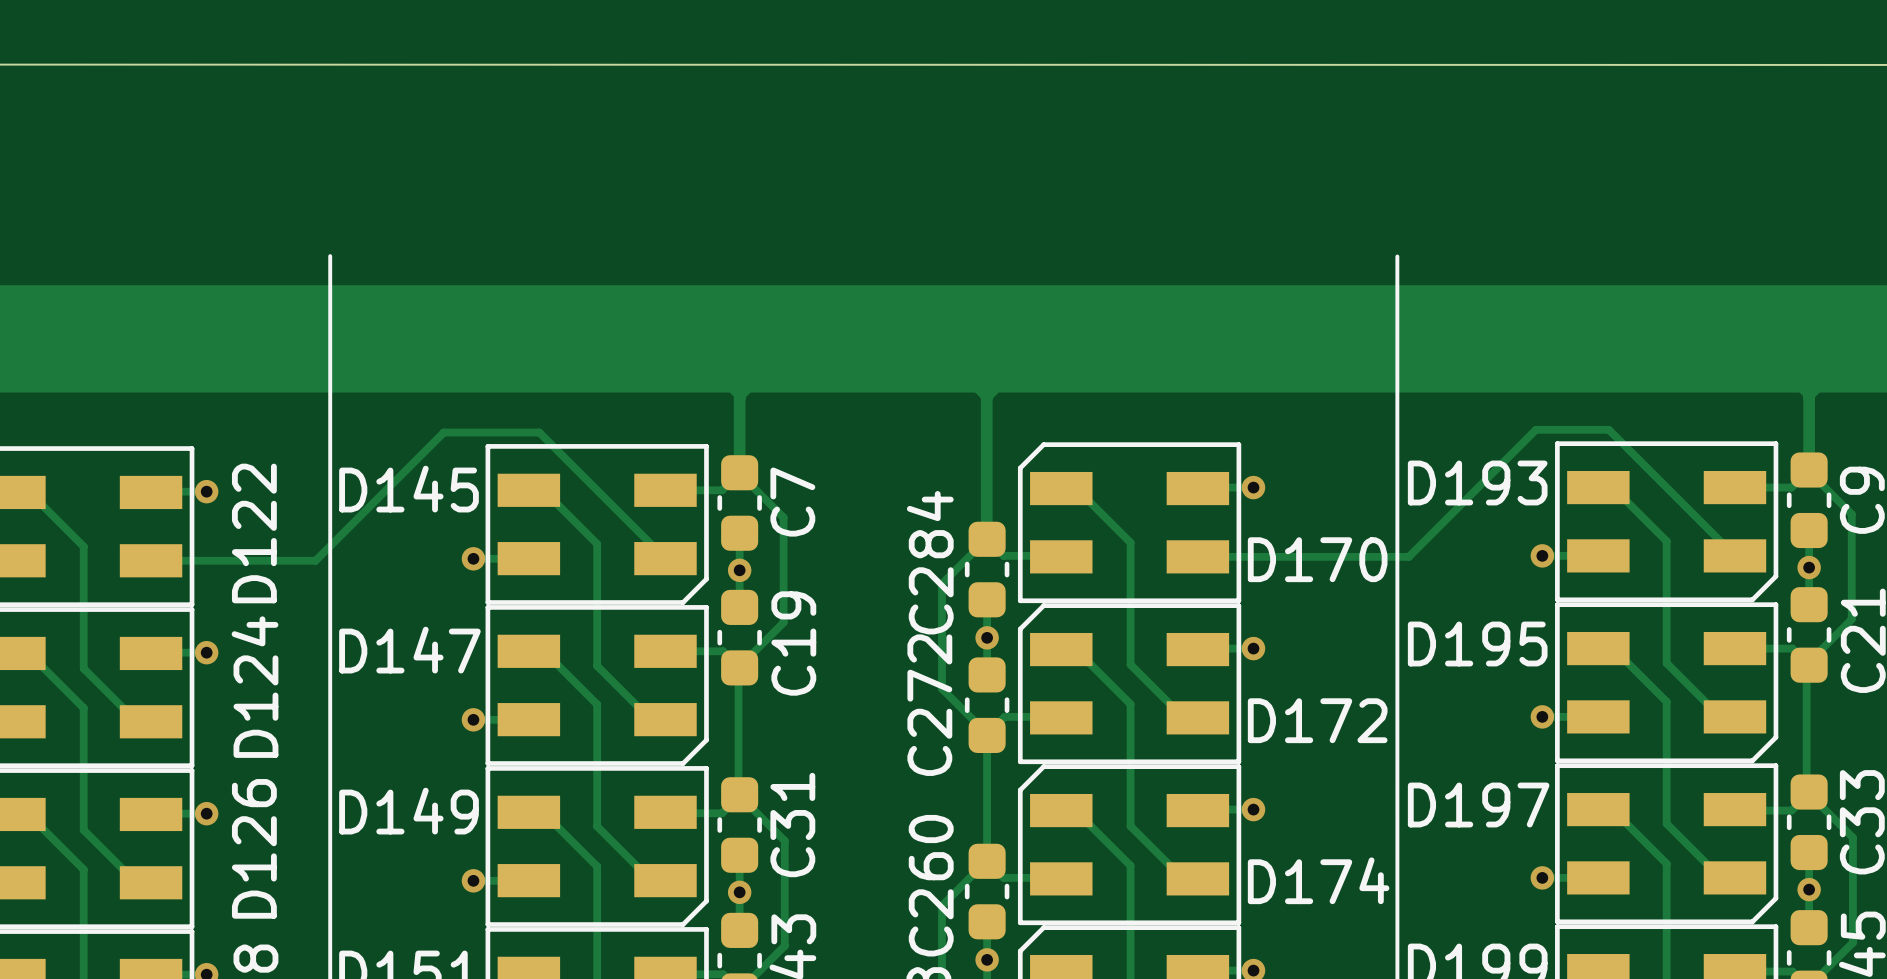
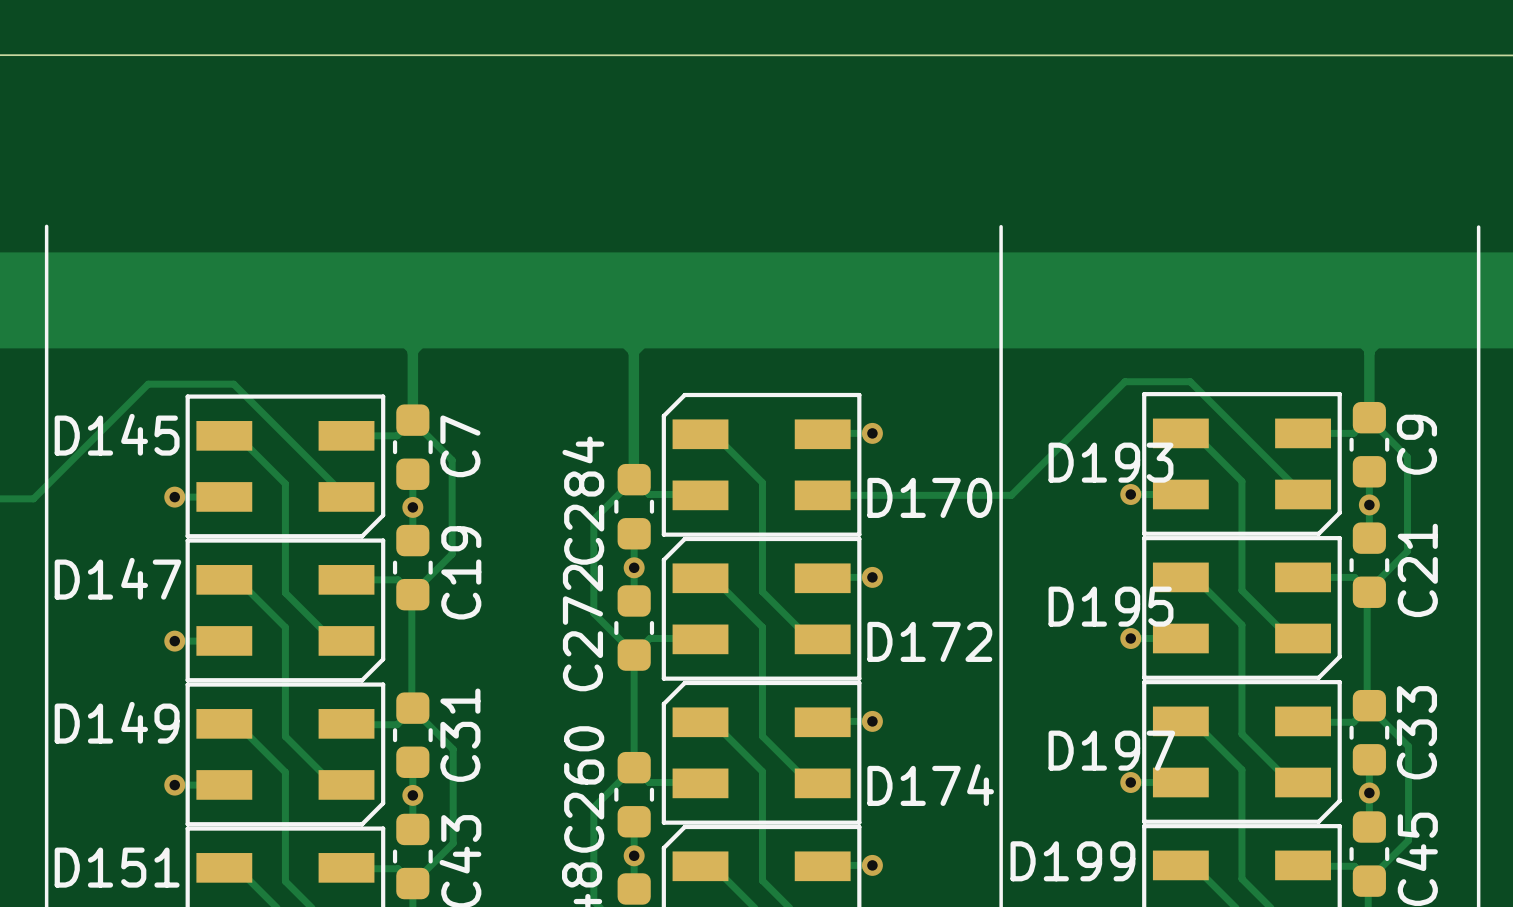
D193 name position: D193 (1477, 482) -> D193 (1111, 462)
D195 name position: D195 (1477, 644) -> D195 (1111, 606)
D197 name position: D197 (1478, 805) -> D197 (1111, 750)

